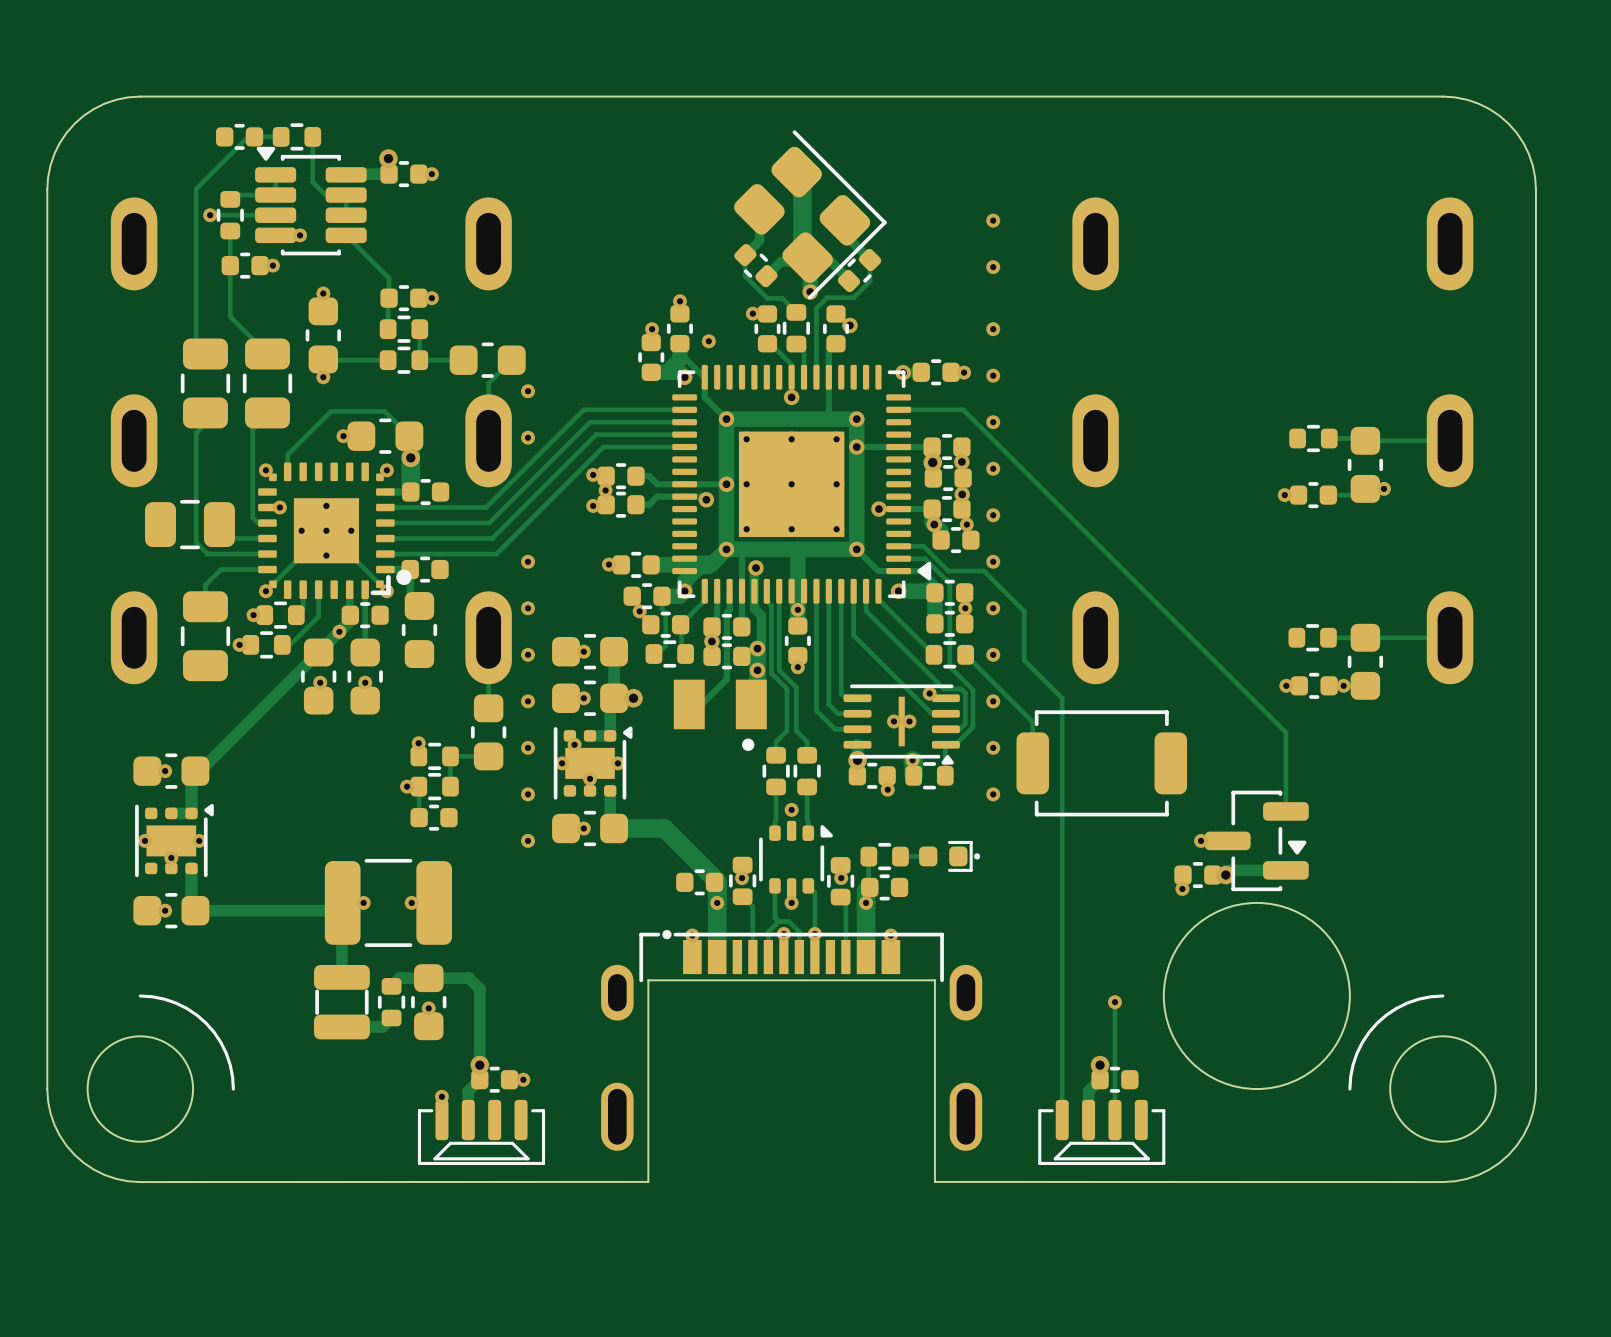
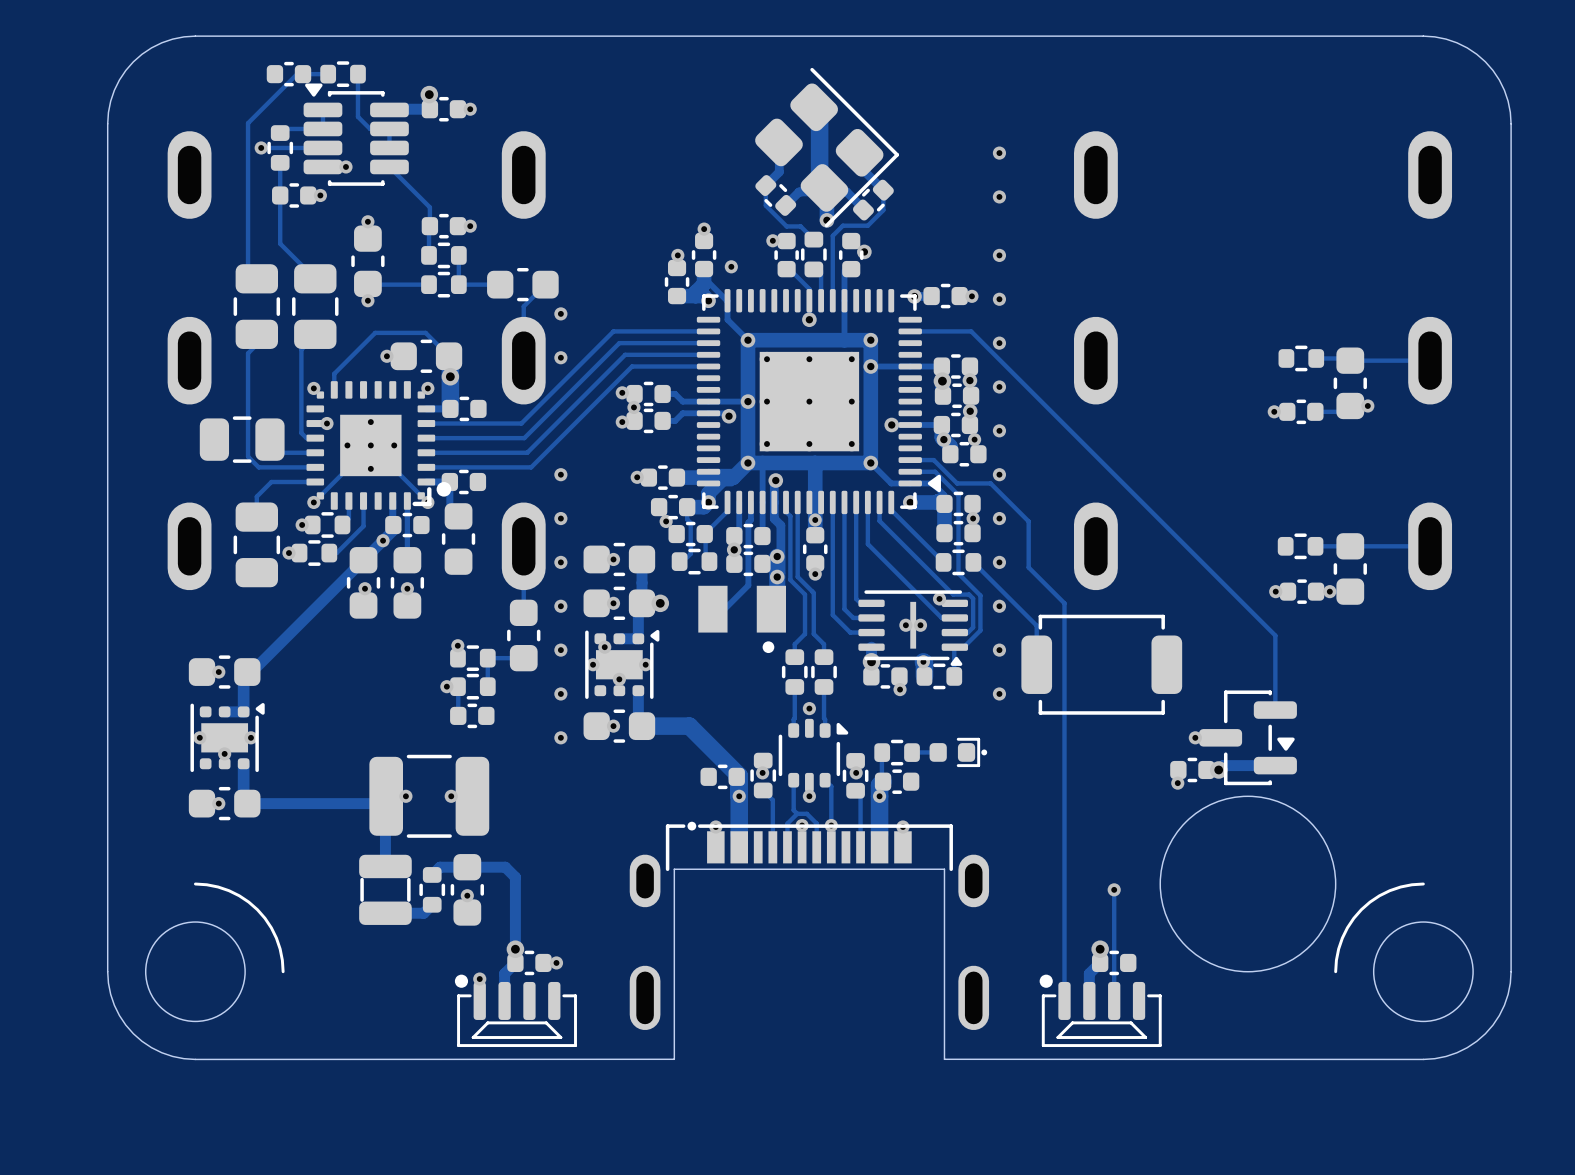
part footprint: [417, 1099, 546, 1166] -> [454, 974, 577, 1048]
part footprint: [1038, 1099, 1166, 1166] -> [1039, 974, 1162, 1048]

